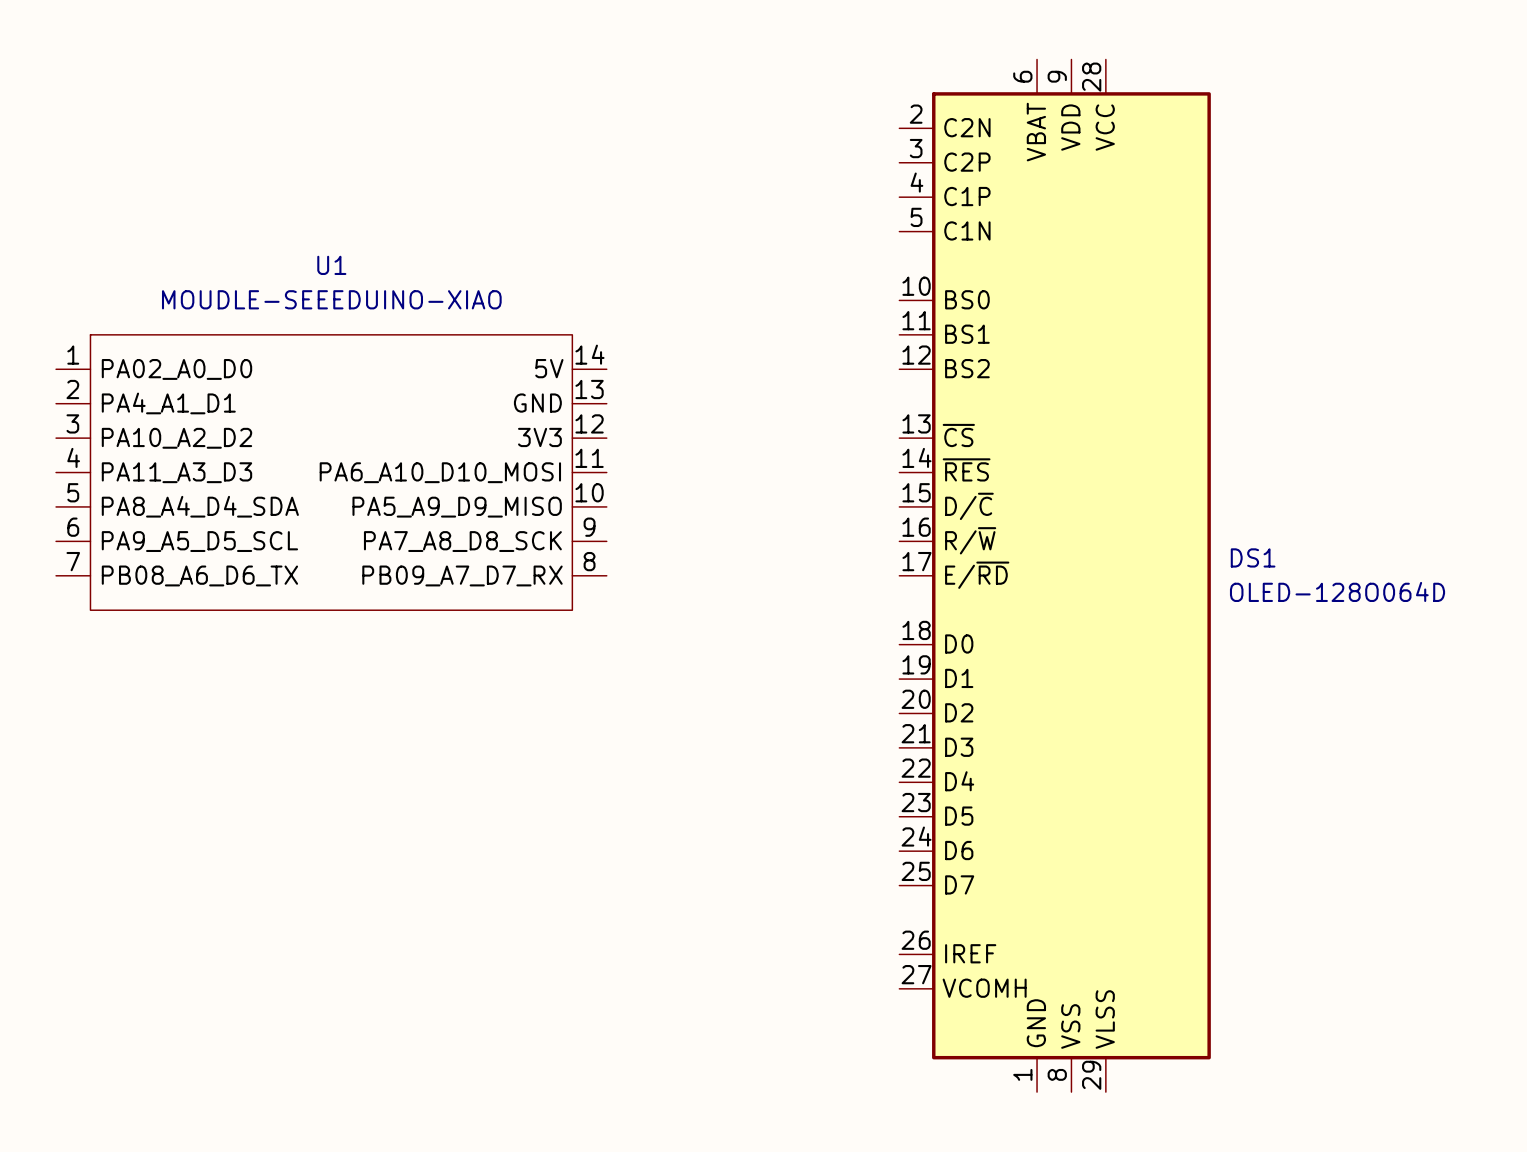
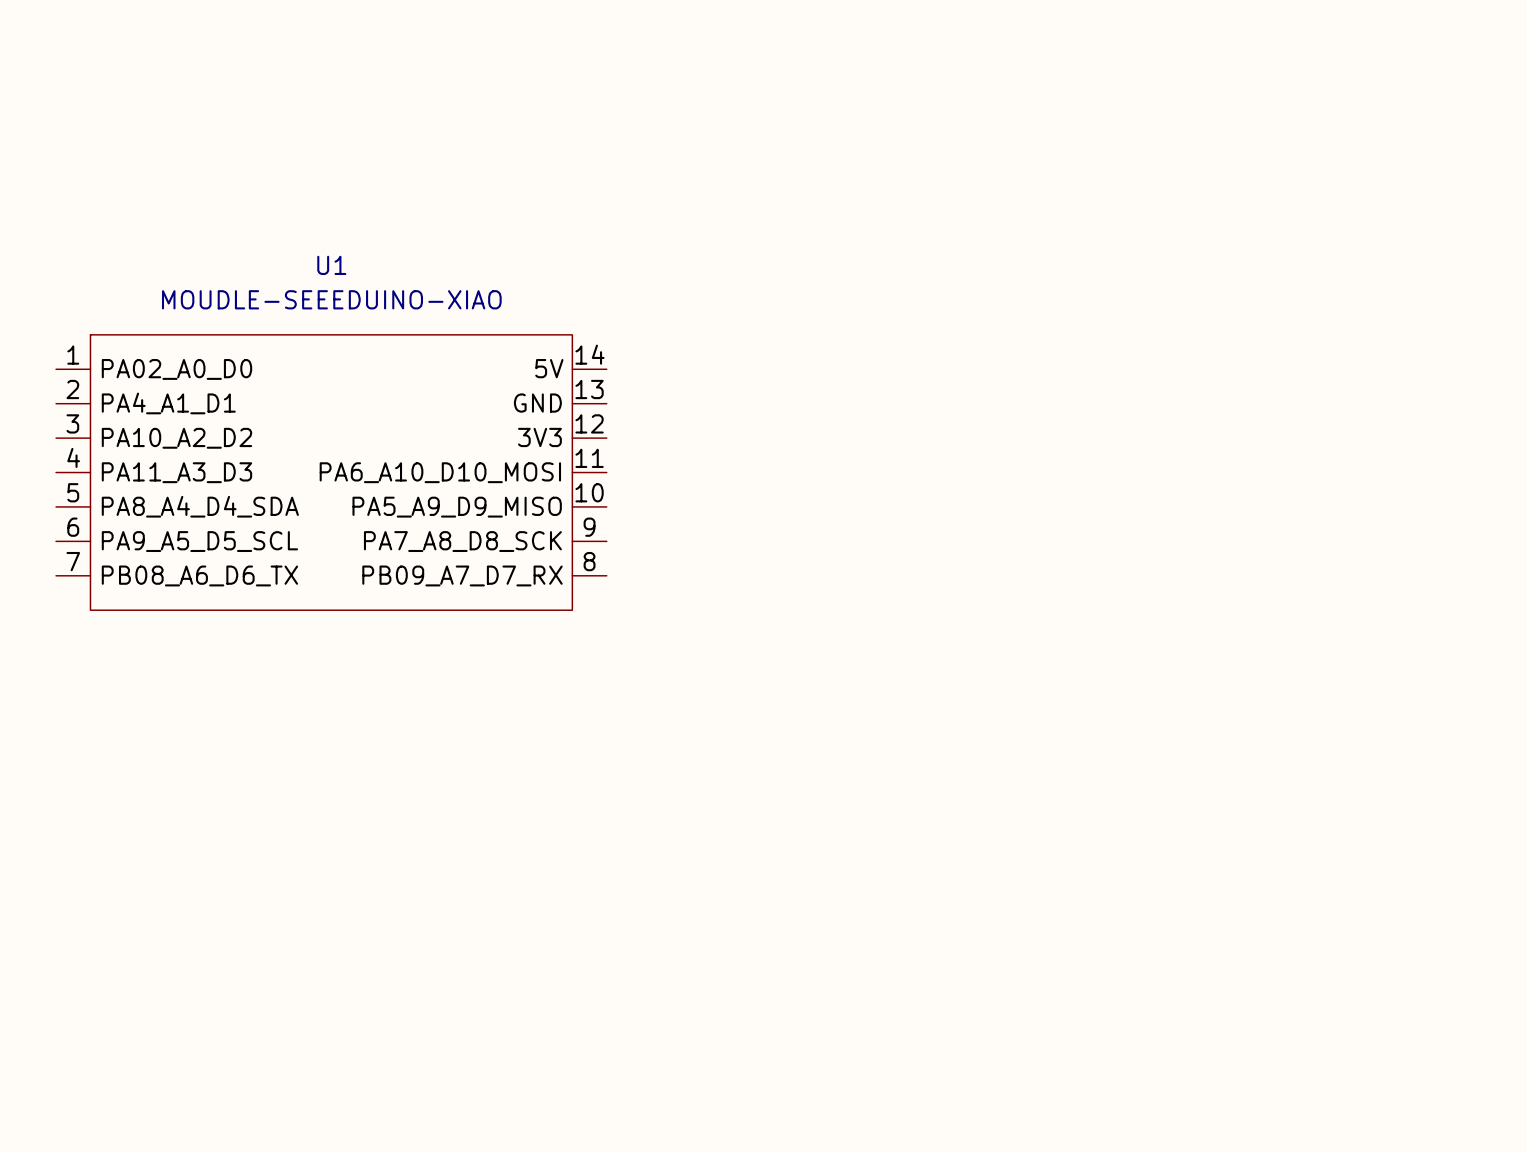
DS1: OLED-128O064D (1055, 575) -> none

